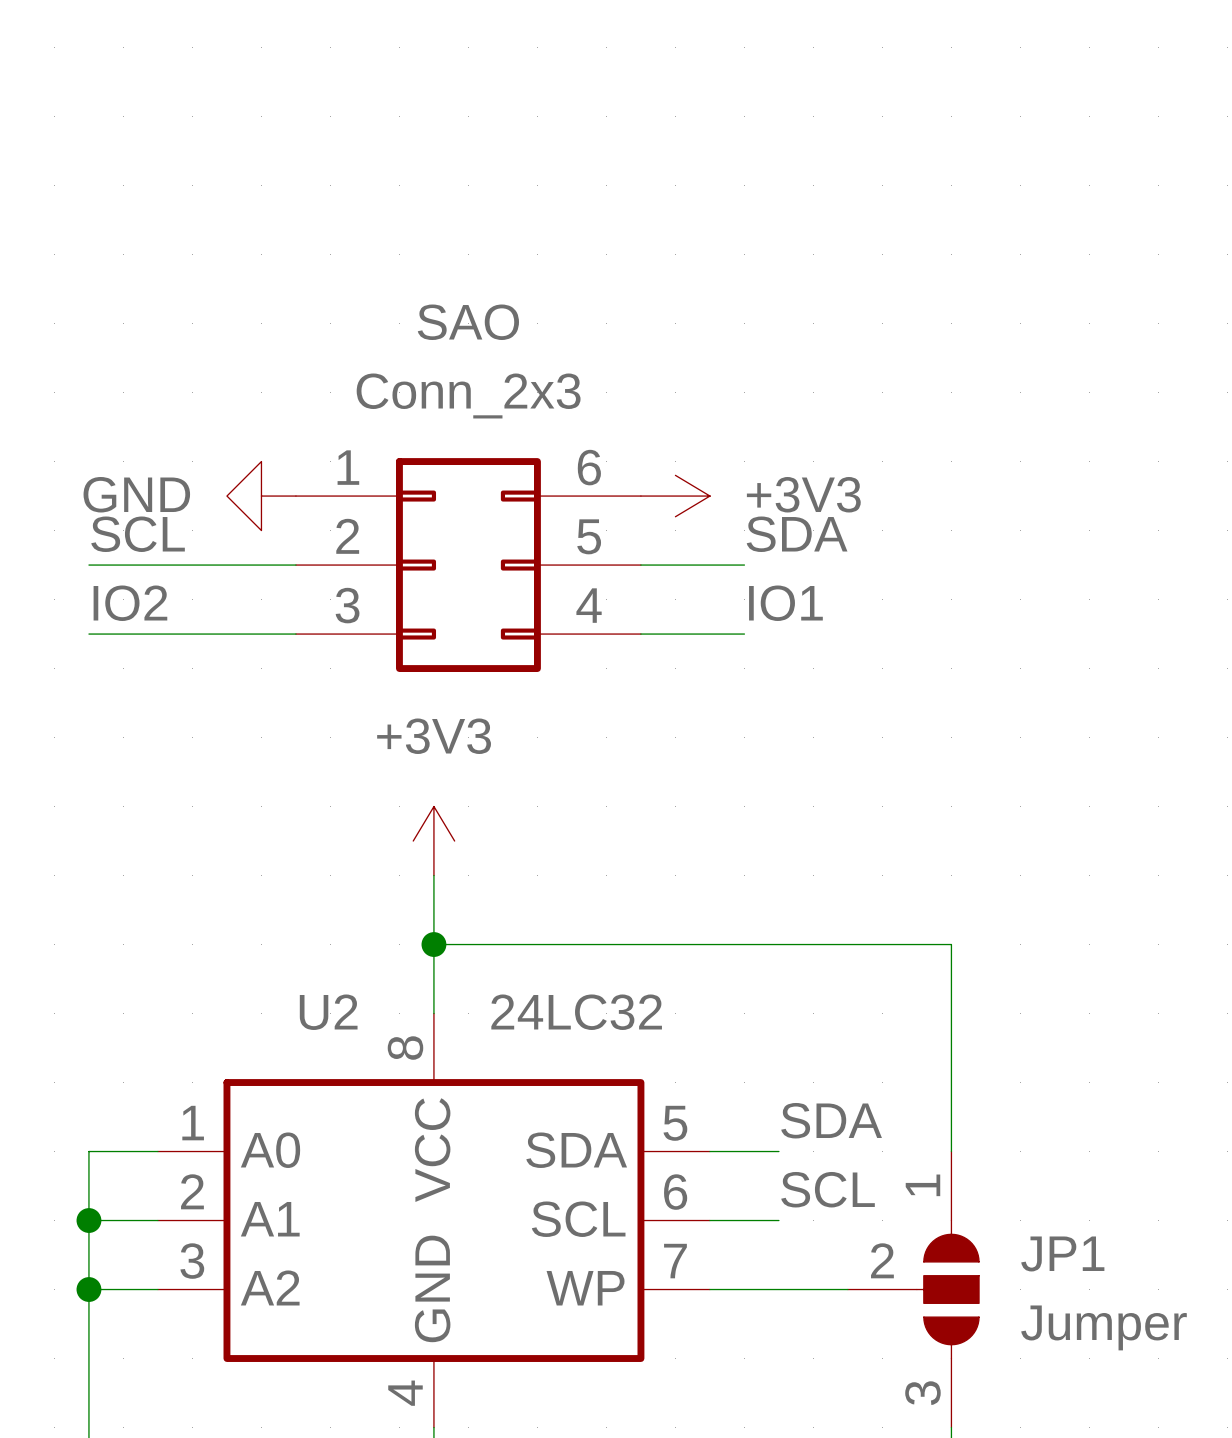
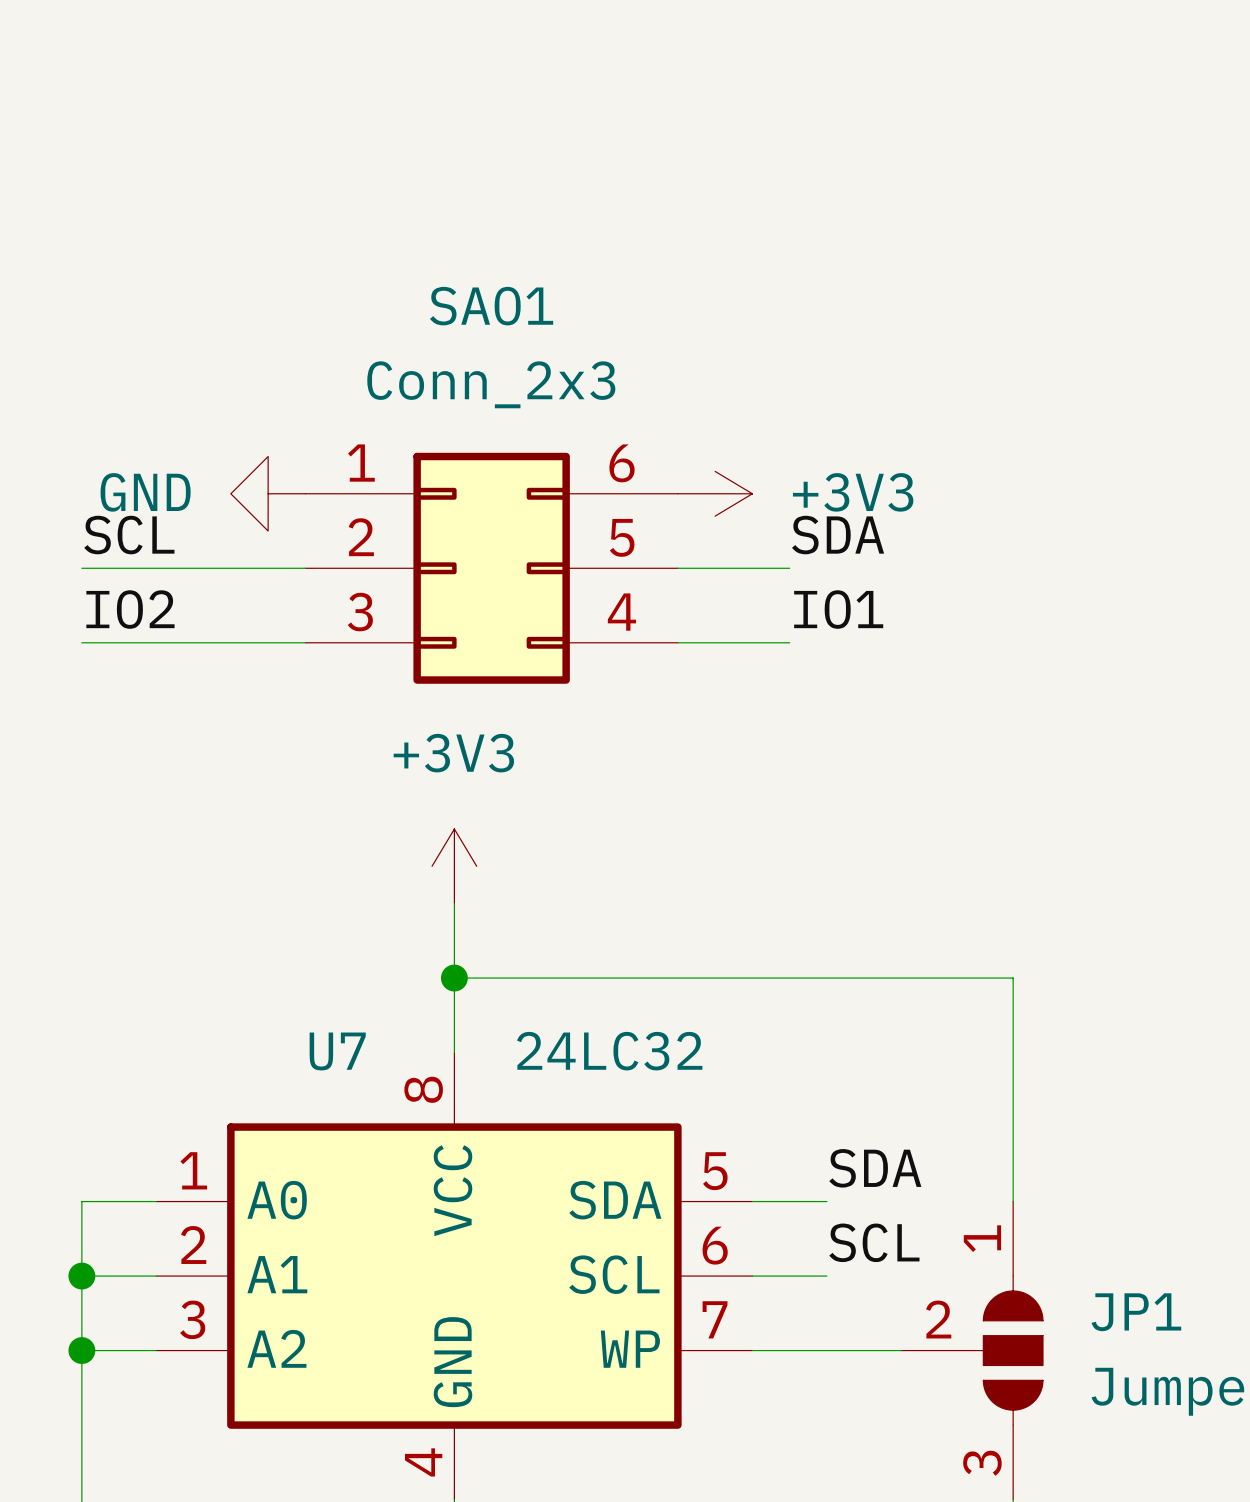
SAO name: SAO (468, 322) -> SAO1 (491, 306)
U2 name: U2 (328, 1012) -> U7 (337, 1051)

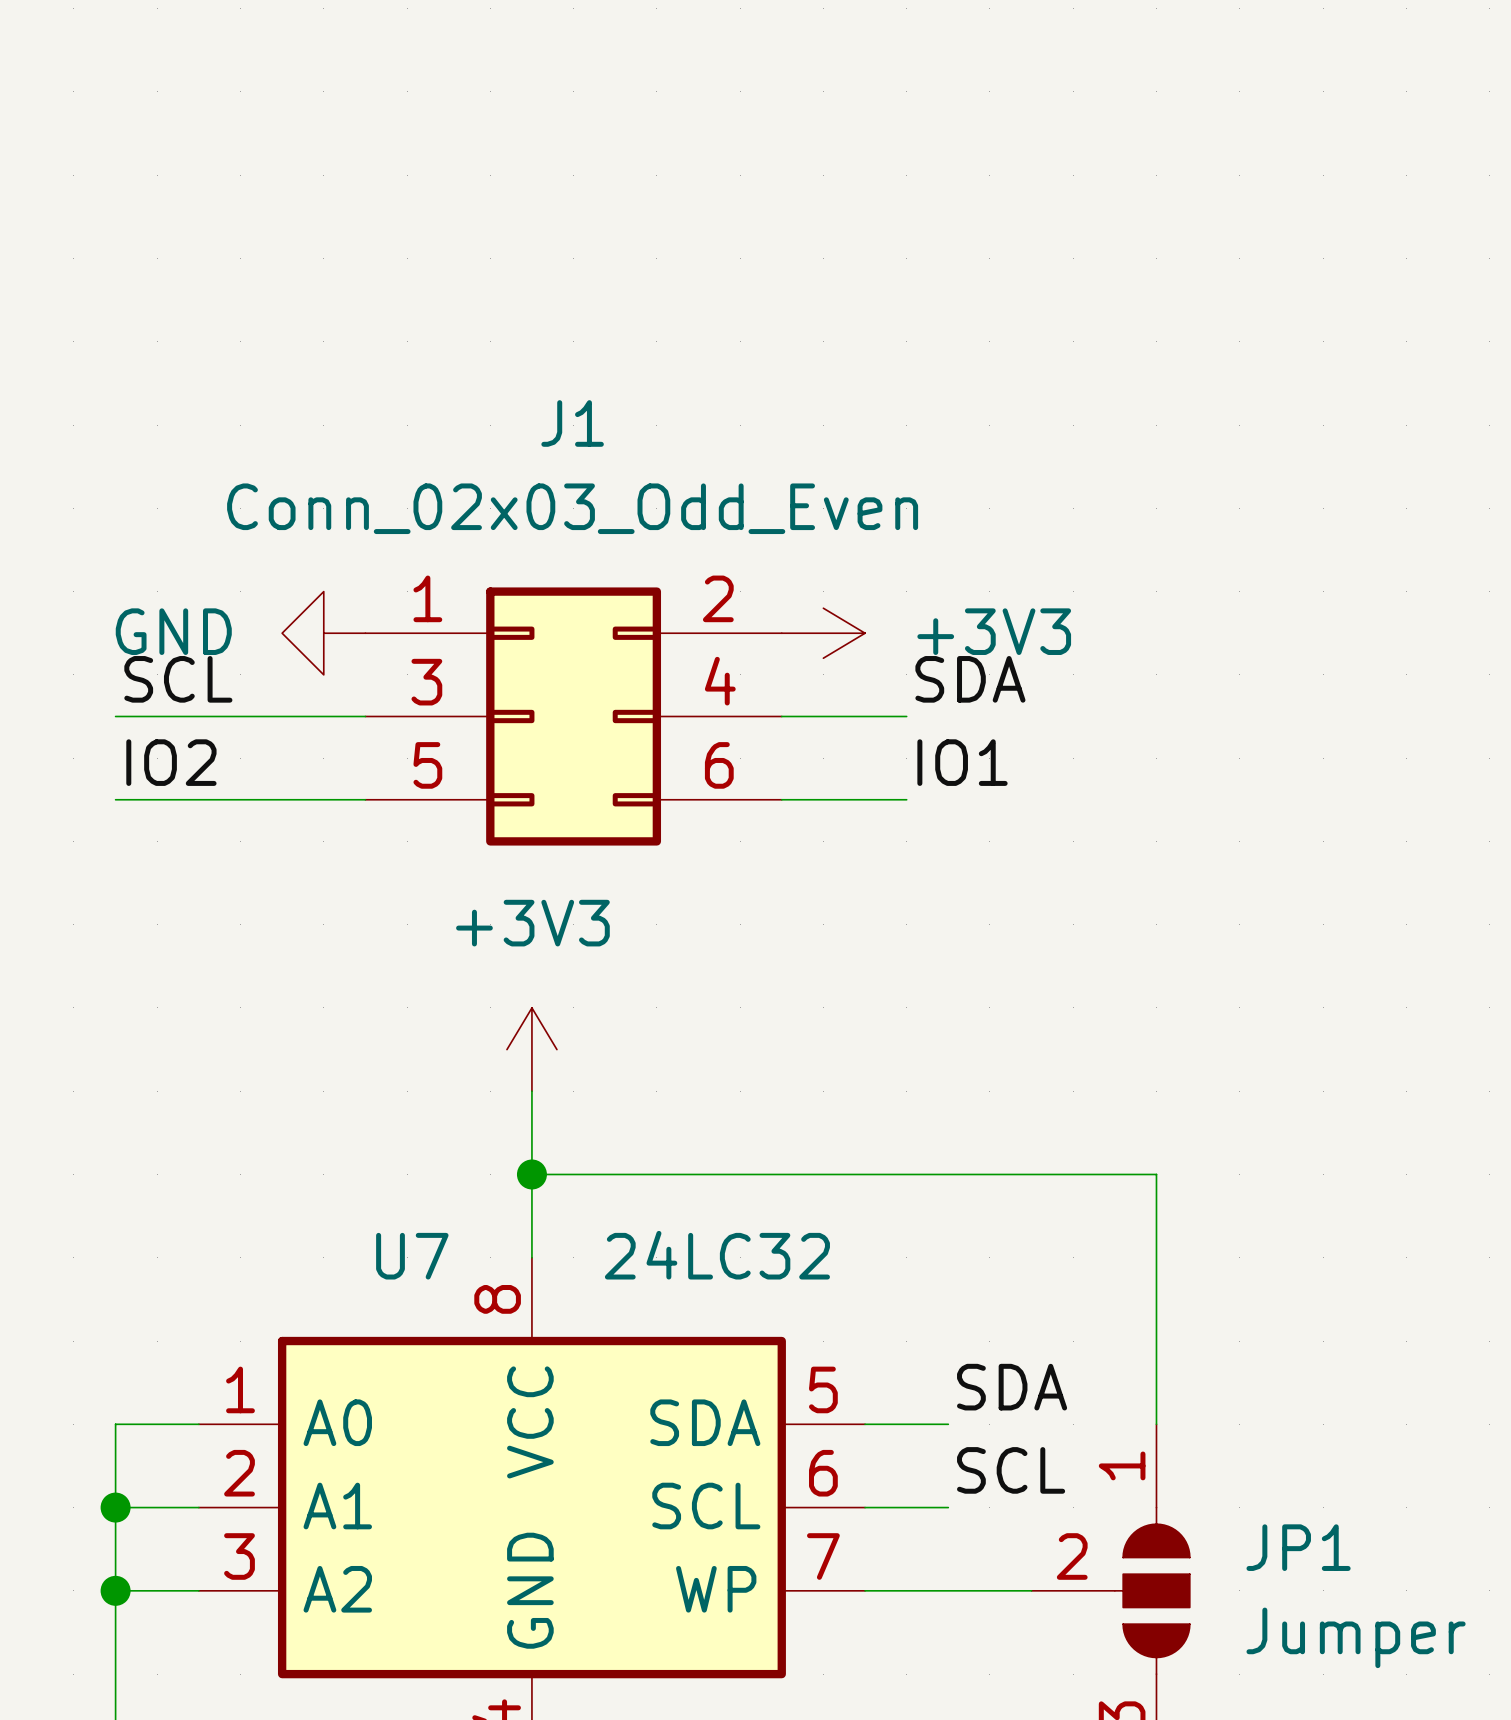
SAO1 name: SAO1 (491, 306) -> J1 (572, 423)
SAO1 value: Conn_2x3 (491, 384) -> Conn_02x03_Odd_Even (572, 508)
SAO1 pin number: 6 (622, 463) -> 2 (718, 598)
SAO1 pin number: 2 (361, 537) -> 3 (426, 682)
SAO1 pin number: 5 (622, 537) -> 4 (720, 681)
SAO1 pin number: 3 (360, 612) -> 5 (427, 765)
SAO1 pin number: 4 (621, 612) -> 6 (719, 765)

